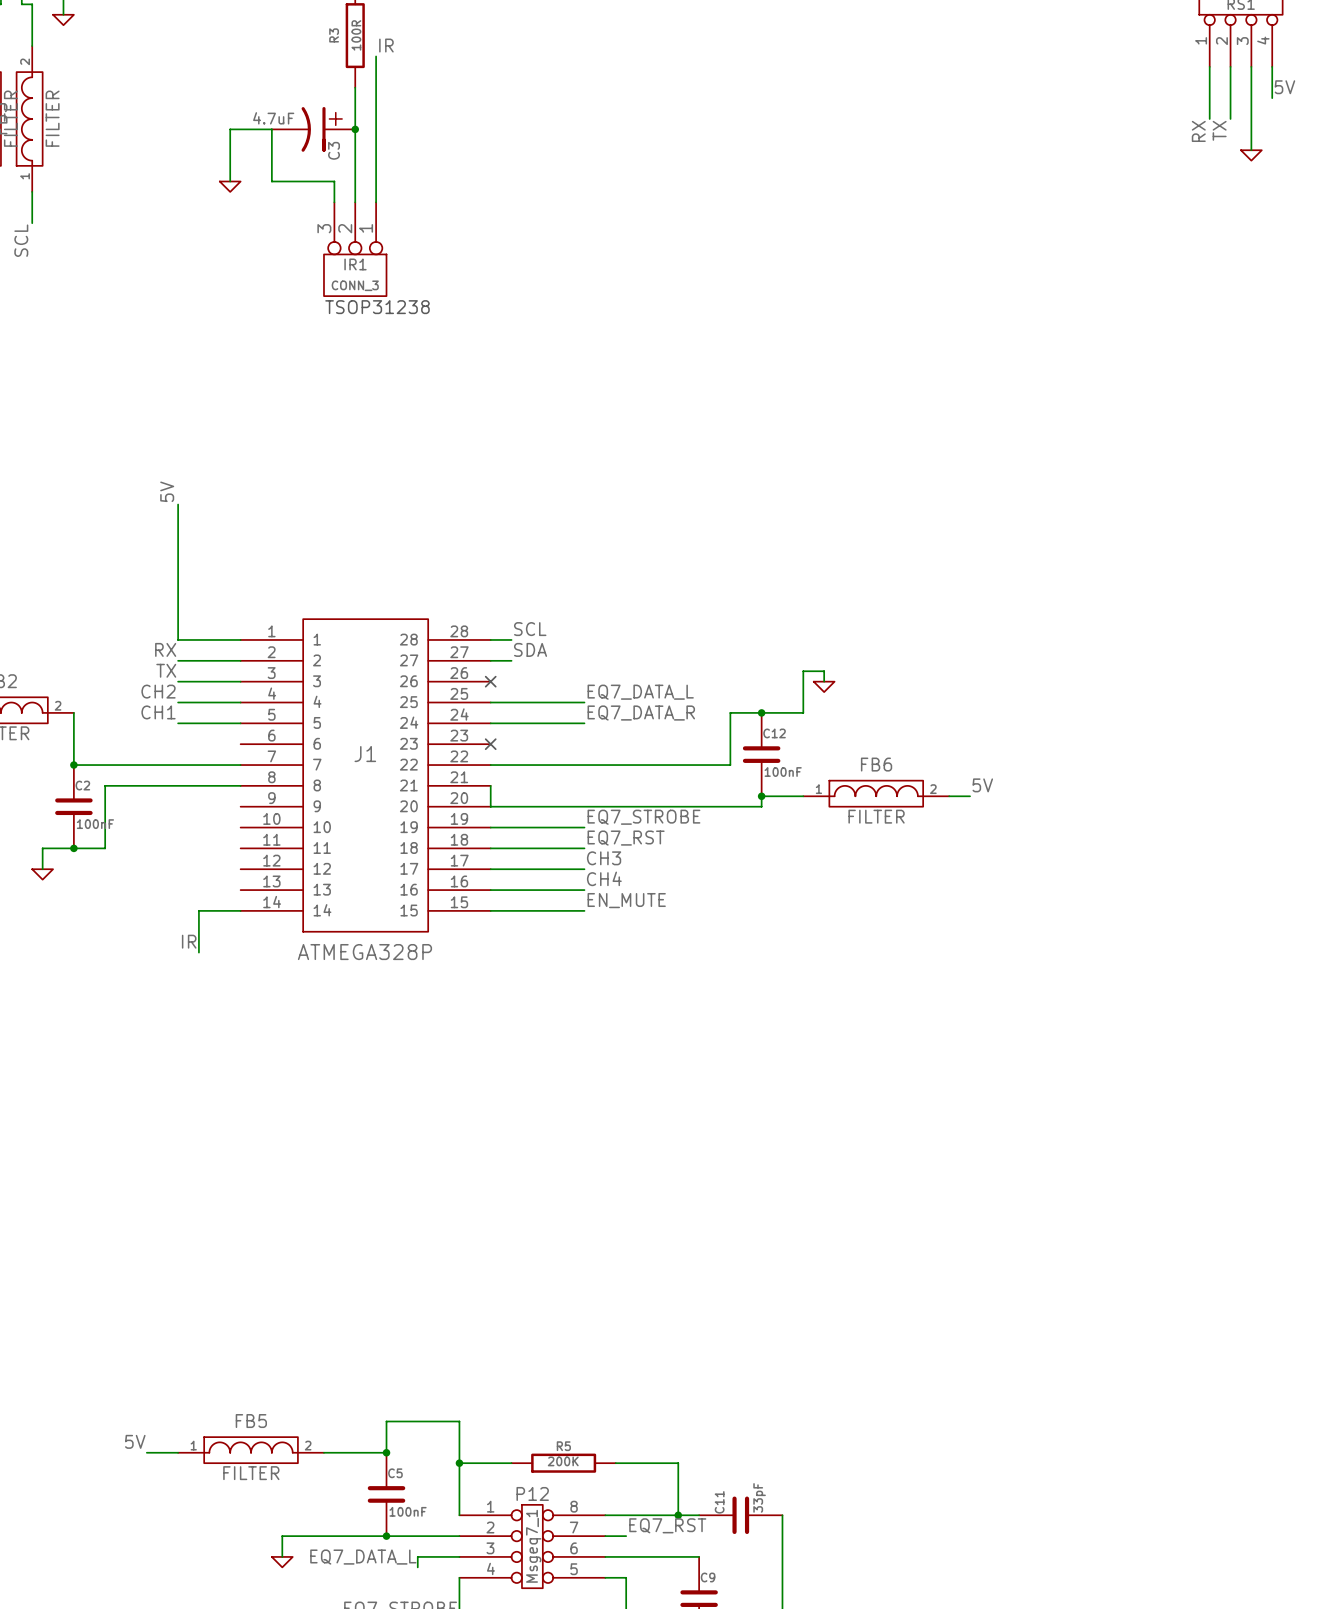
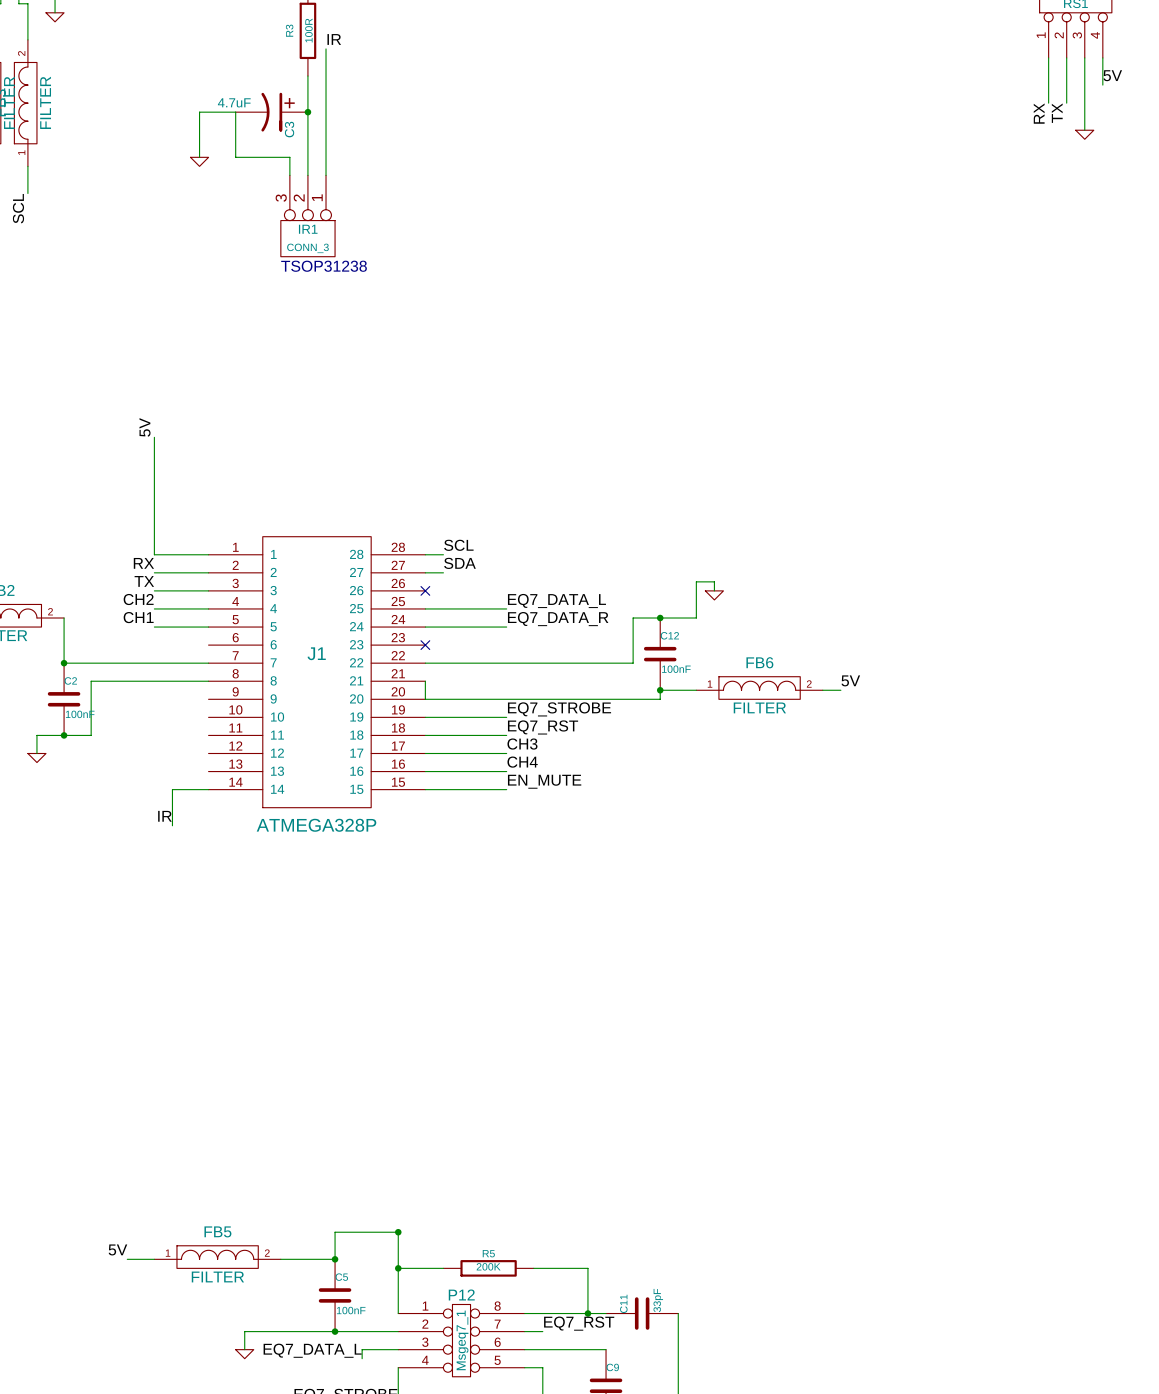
junction: none -> (398, 1232)

